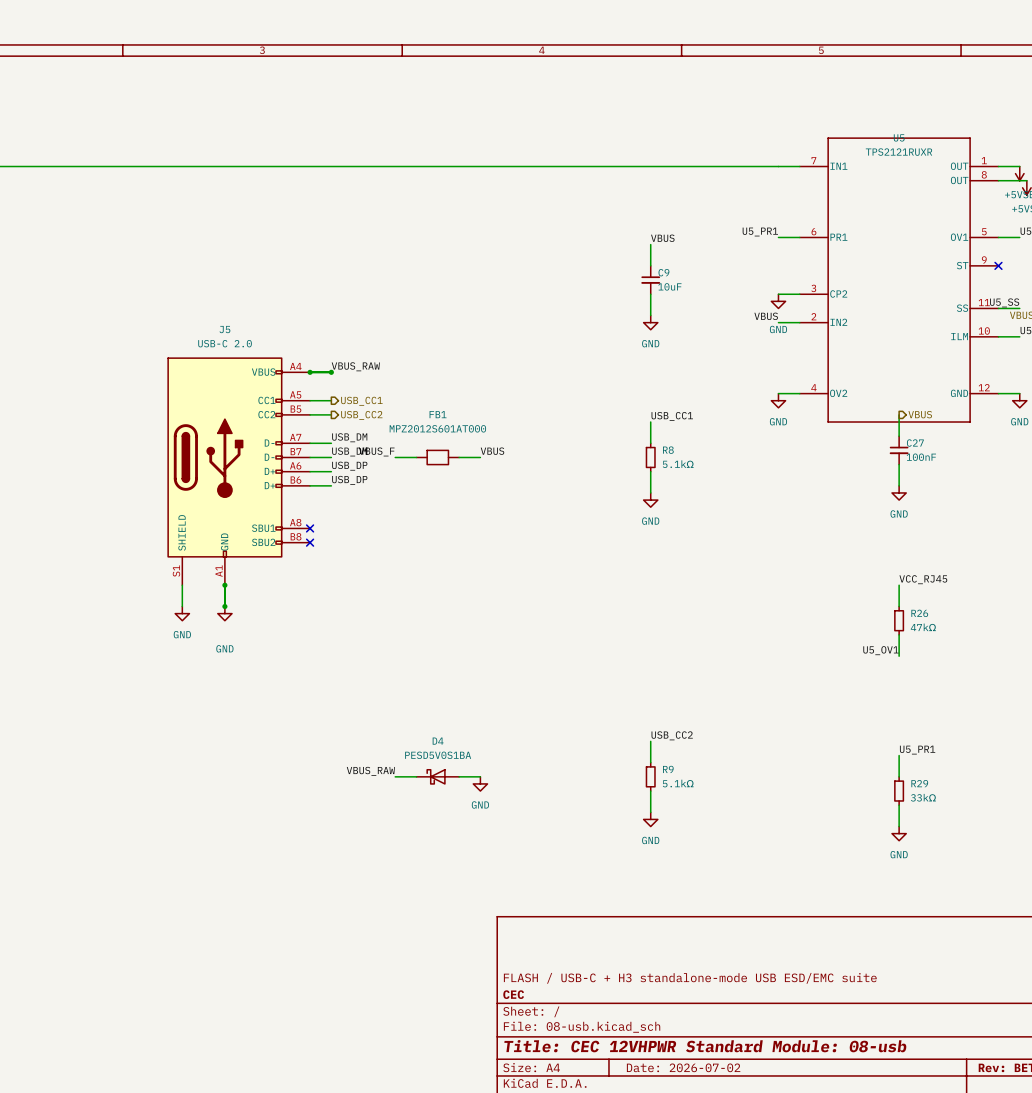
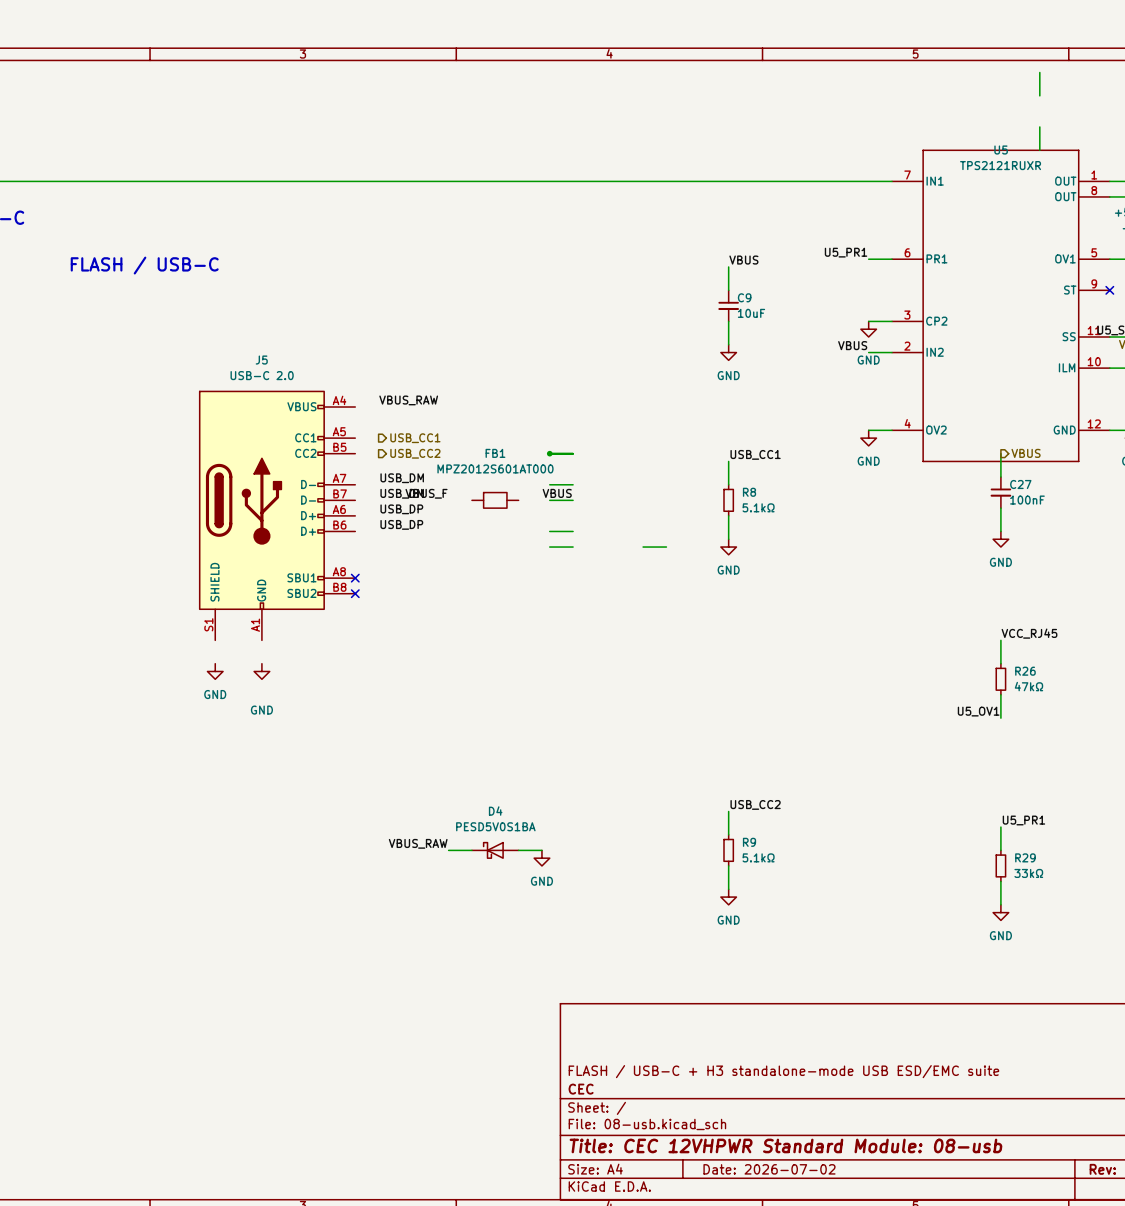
wire: none -> (1039, 72) (1039, 95)
wire: none -> (1039, 126) (1039, 150)
text: none -> FLASH / USB-C (144, 265)
wire: (310, 372) (331, 372) -> none
junction: (310, 372) -> none
junction: (331, 372) -> none
wire: (310, 400) (331, 400) -> none
wire: (310, 414) (331, 414) -> none
wire: none -> (549, 453) (573, 453)
junction: none -> (549, 453)
wire: (310, 443) (331, 443) -> none
wire: (310, 457) (331, 457) -> none
wire: (395, 457) (416, 457) -> (549, 484) (573, 484)
wire: (459, 457) (480, 457) -> (549, 500) (573, 500)
wire: (310, 471) (331, 471) -> none
wire: (310, 485) (331, 485) -> none
wire: none -> (549, 531) (573, 531)
wire: none -> (549, 547) (573, 547)
wire: none -> (643, 547) (666, 547)
wire: (182, 585) (182, 606) -> none
wire: (224, 585) (224, 606) -> none
junction: (224, 585) -> none
junction: (224, 606) -> none

